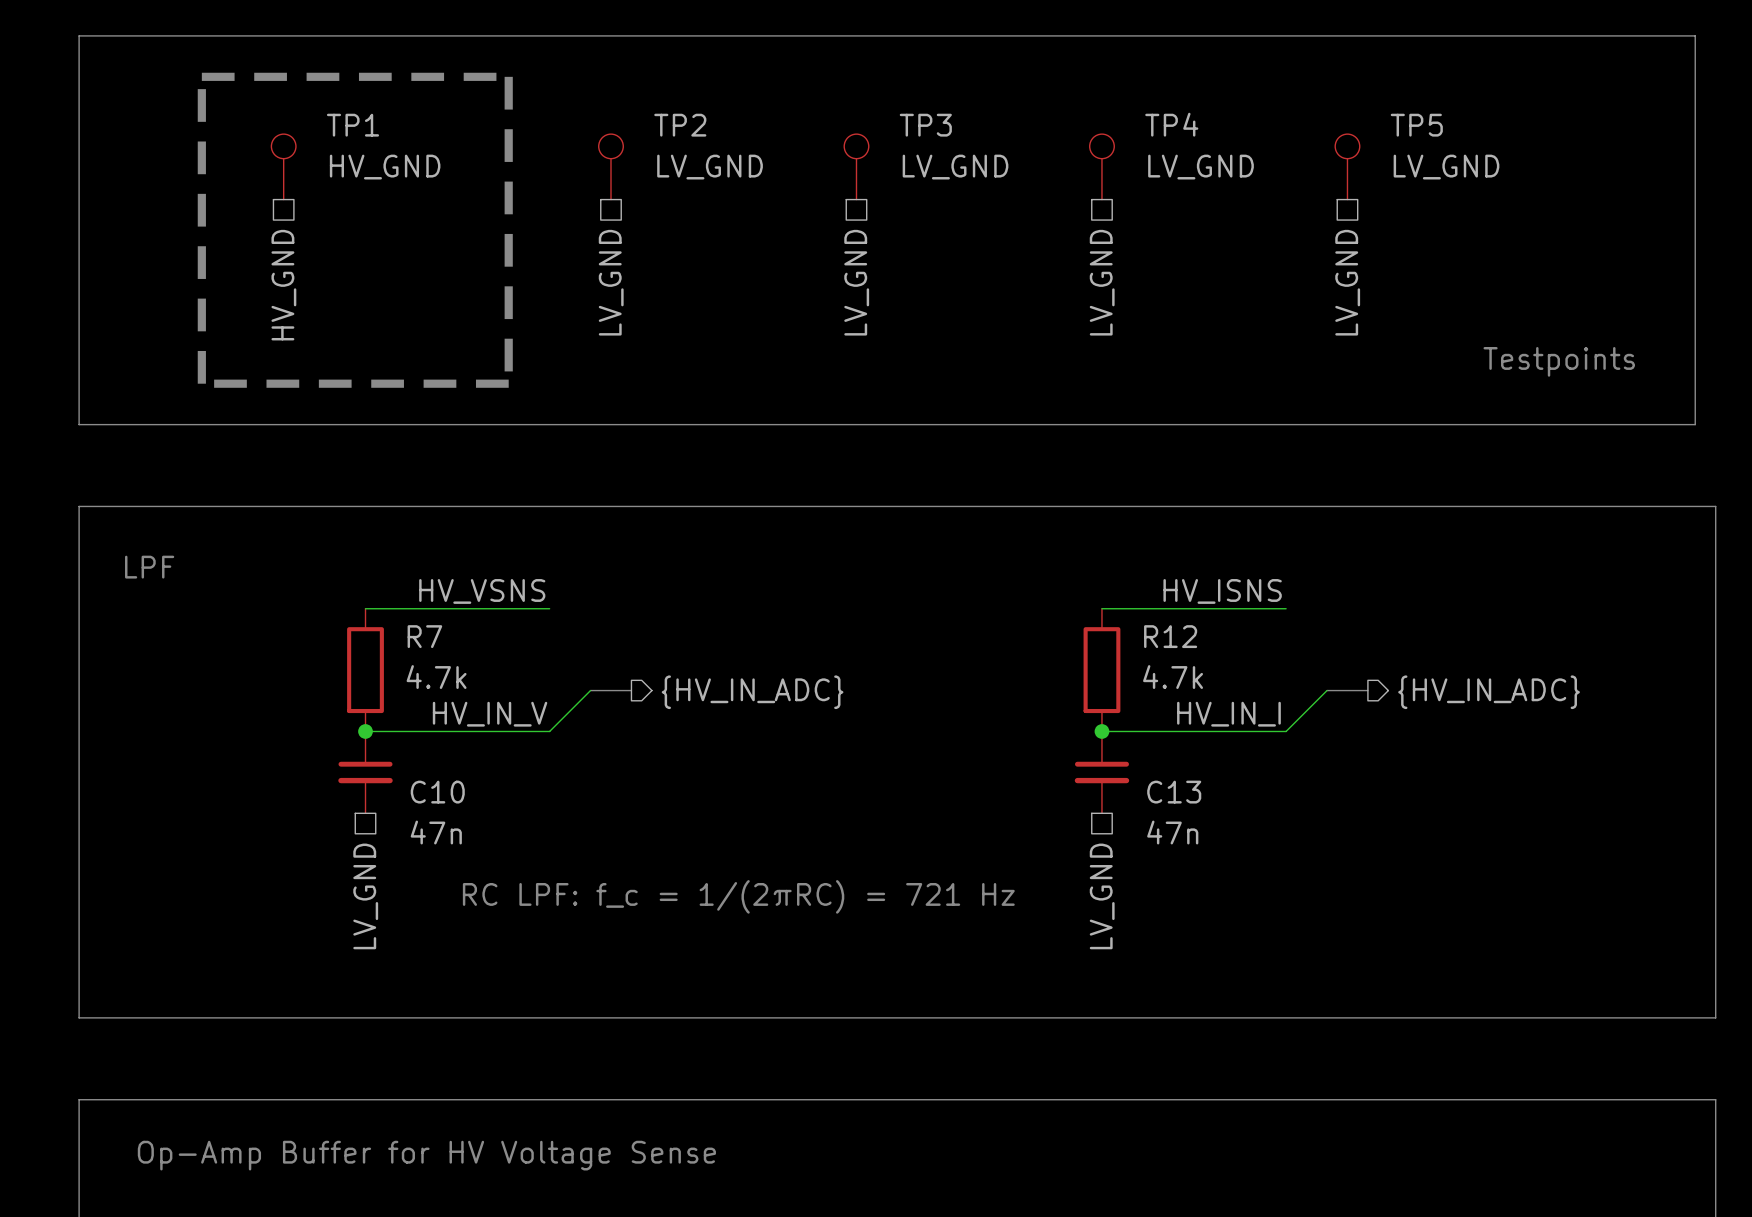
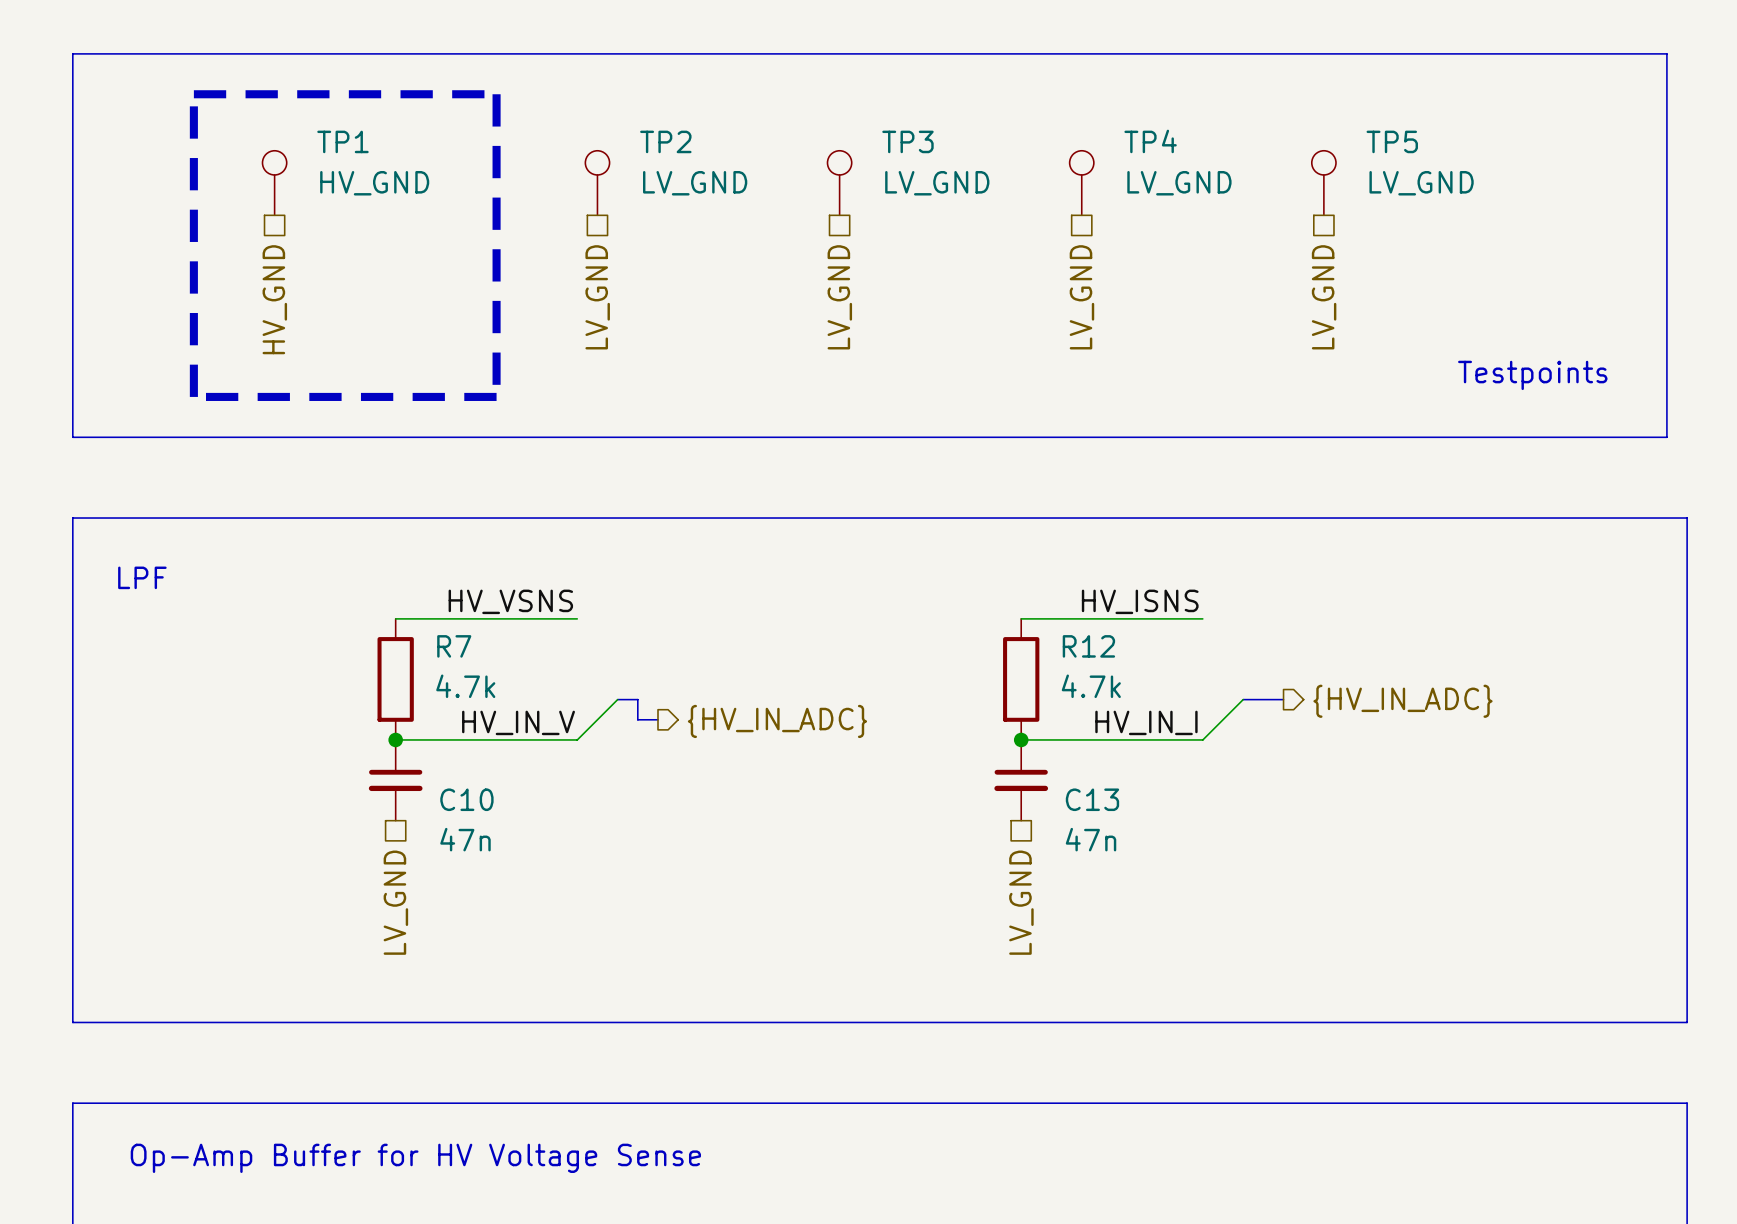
label position: HV_VSNS (482, 591) -> HV_VSNS (510, 601)
label position: HV_ISNS (1222, 591) -> HV_ISNS (1140, 601)
wire: (365, 608) (406, 608) -> (536, 618) (577, 618)
wire: (1224, 608) (1286, 608) -> (1021, 618) (1081, 618)
R7 position: (365, 670) -> (395, 679)
R12 position: (1101, 670) -> (1021, 679)
wire: (590, 690) (549, 731) -> (617, 699) (577, 739) (536, 739)
bus: (590, 690) (631, 690) -> (657, 719) (637, 719) (637, 699) (617, 699)
wire: (1327, 690) (1286, 731) (1224, 731) -> (1243, 699) (1202, 739)
bus: (1327, 690) (1367, 690) -> (1243, 699) (1283, 699)
hierarchical label position: {HV_IN_ADC} (752, 692) -> {HV_IN_ADC} (777, 721)
hierarchical label position: {HV_IN_ADC} (1489, 692) -> {HV_IN_ADC} (1403, 701)
label position: HV_IN_V (490, 714) -> HV_IN_V (518, 722)
label position: HV_IN_I (1228, 714) -> HV_IN_I (1146, 722)
wire: (365, 731) (406, 731) -> none
junction position: (365, 731) -> (395, 739)
wire: none -> (1021, 739) (1081, 739)
junction position: (1101, 731) -> (1021, 739)
C10 position: (365, 772) -> (395, 780)
C13 position: (1101, 772) -> (1021, 780)
hierarchical label position: LV_GND (365, 896) -> LV_GND (395, 902)
text: RC LPF: f_c = 1/(2πRC) = 721 Hz (738, 896) -> none
hierarchical label position: LV_GND (1102, 896) -> LV_GND (1021, 902)

